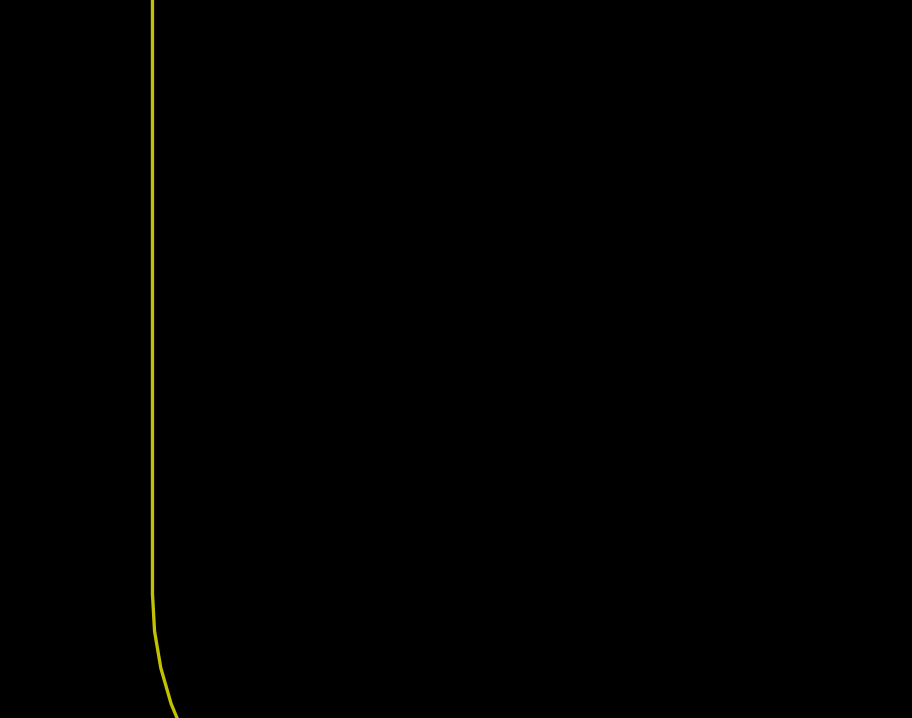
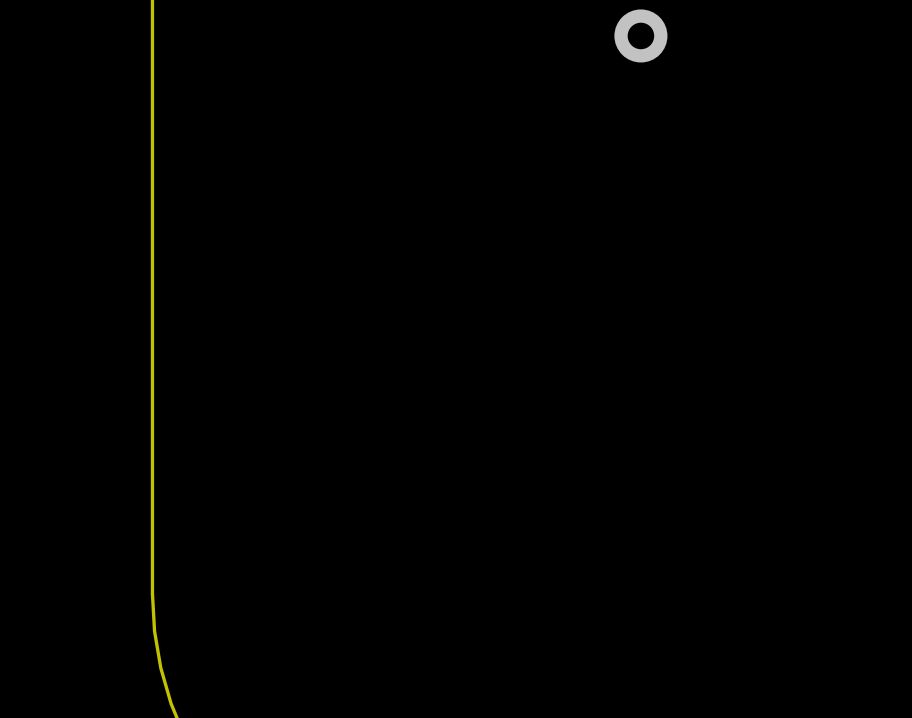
via: none -> (640, 35)

